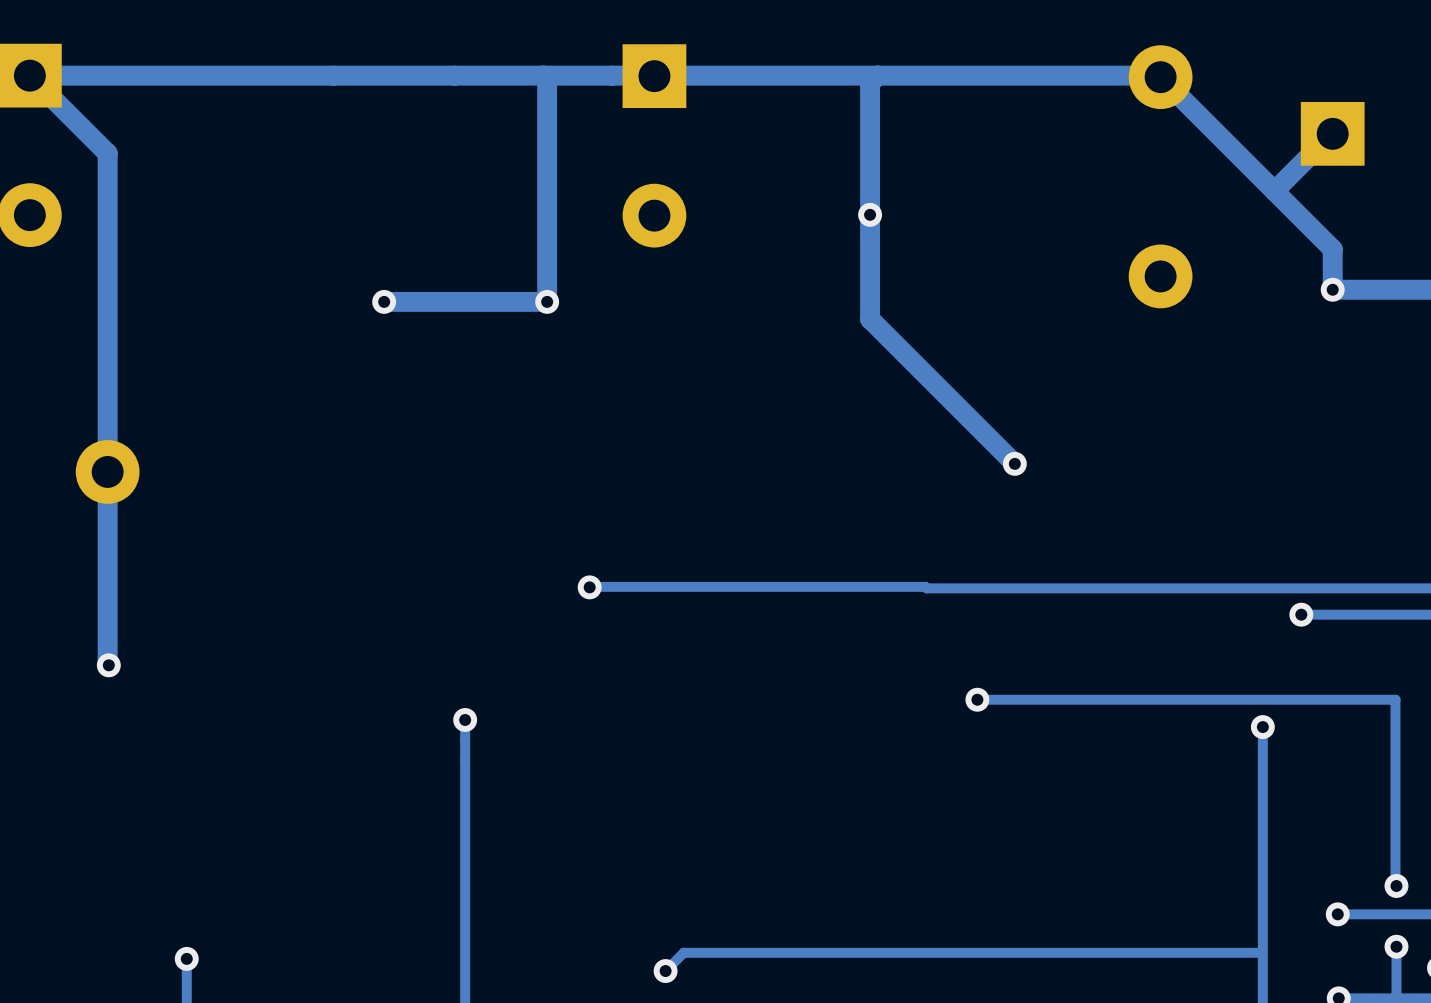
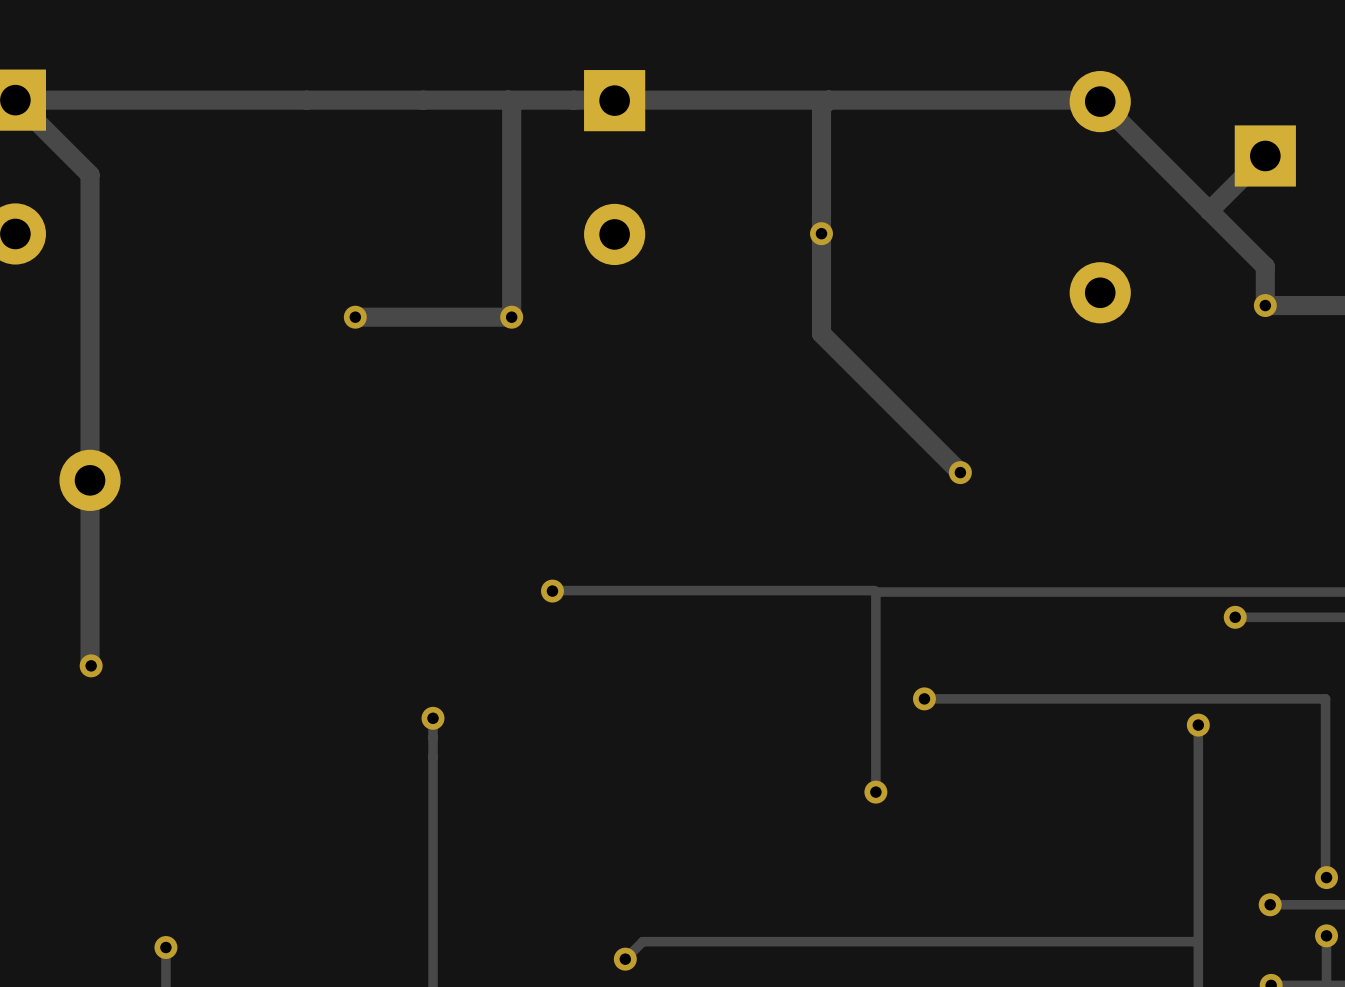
track: none -> (875, 592) (875, 792)
via: none -> (875, 792)

